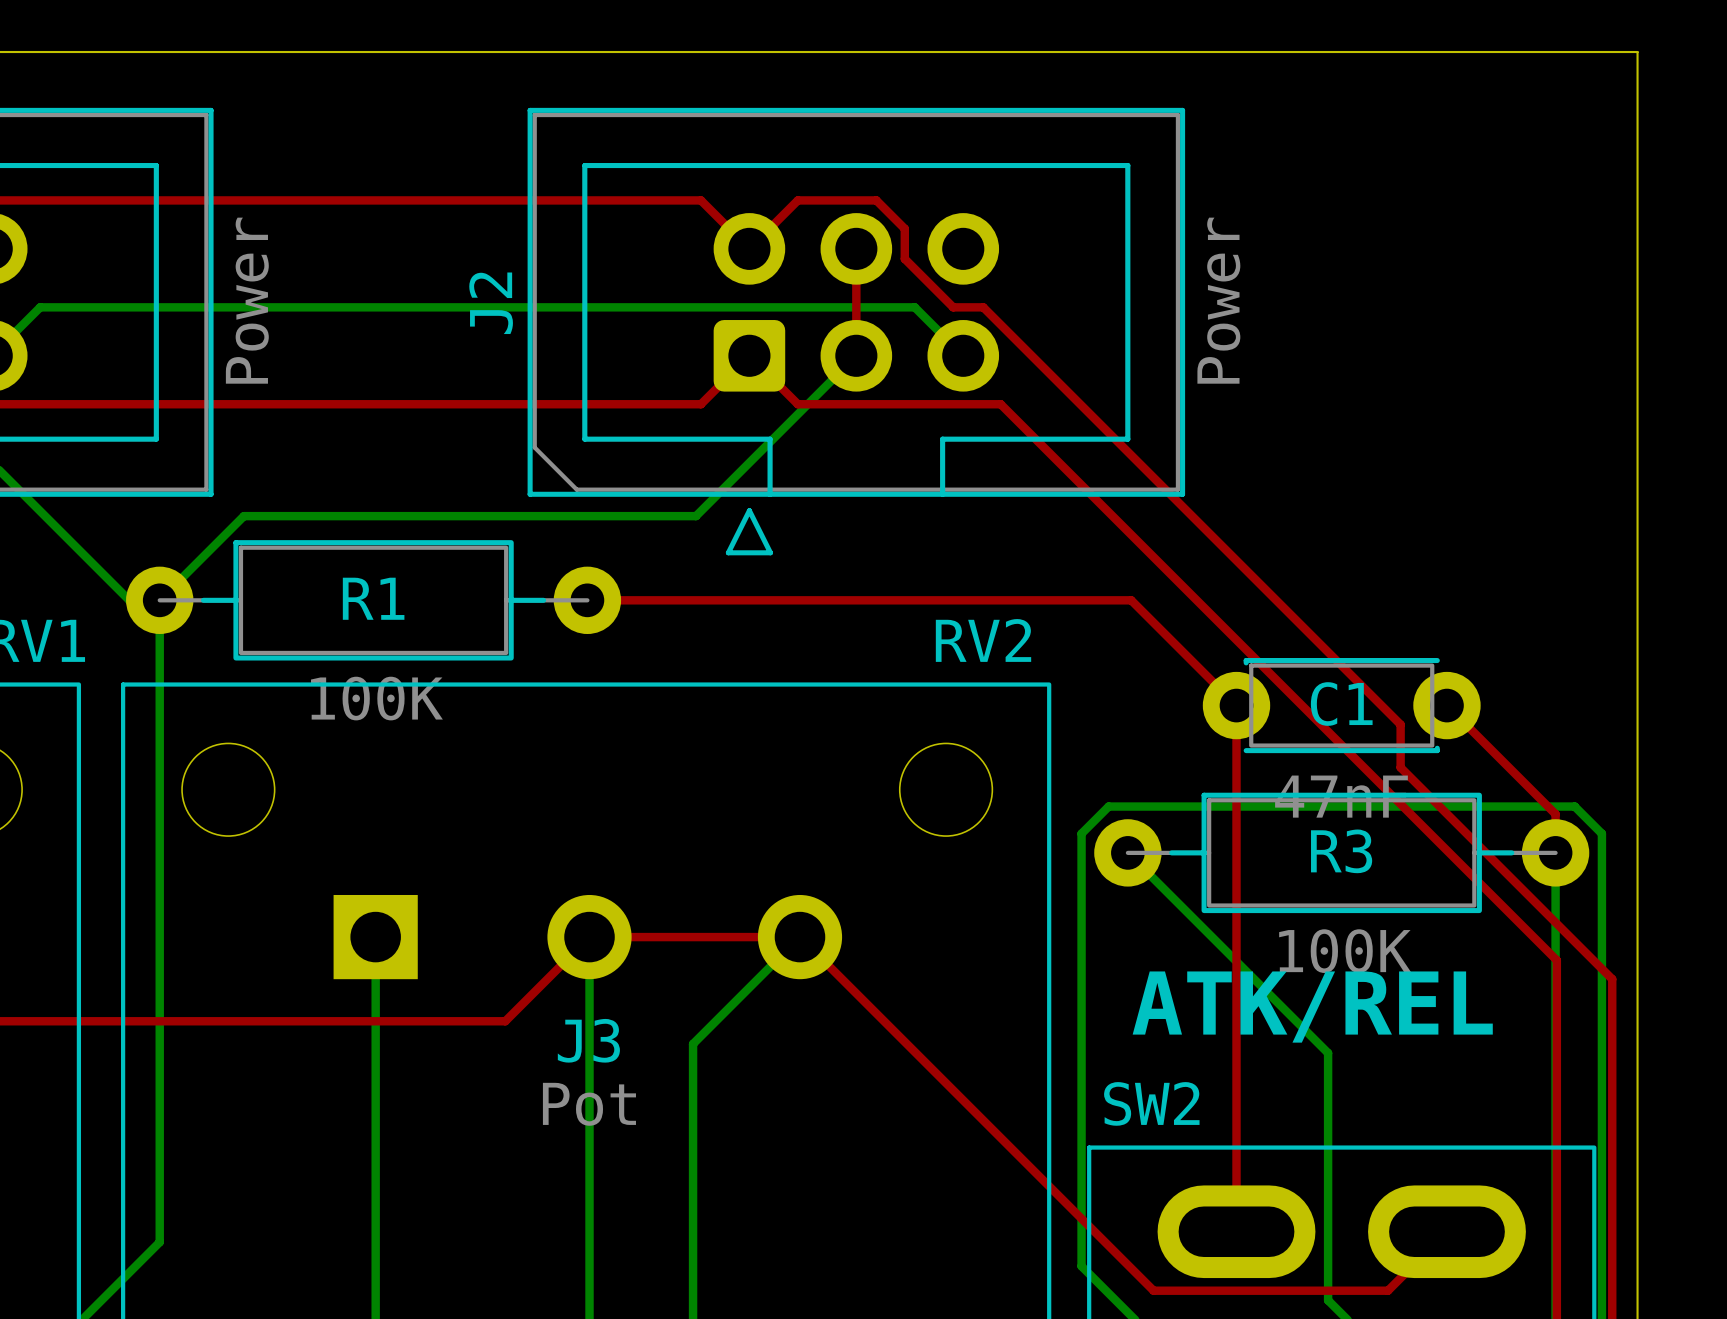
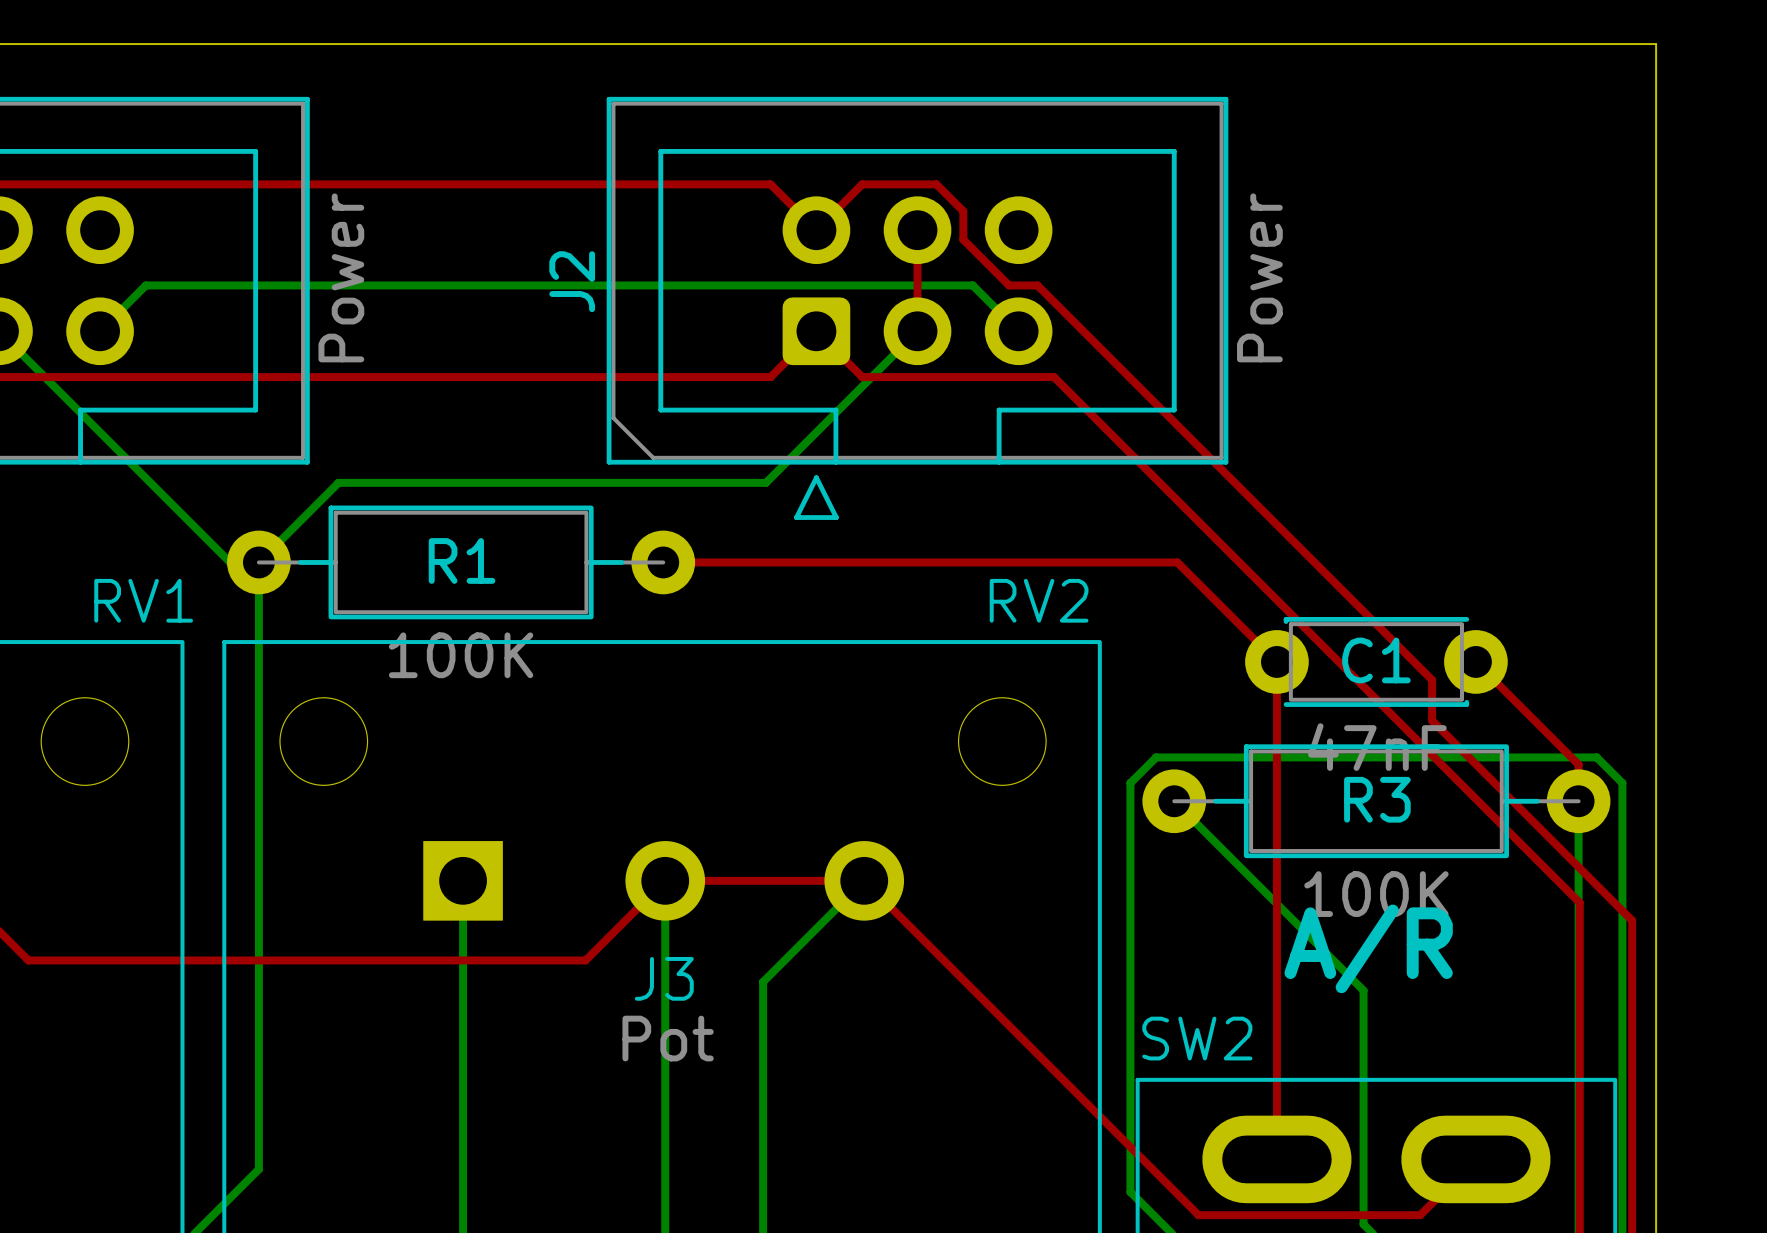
text: ATK/REL (1312, 1007) -> none
text: none -> A/R (1368, 948)

